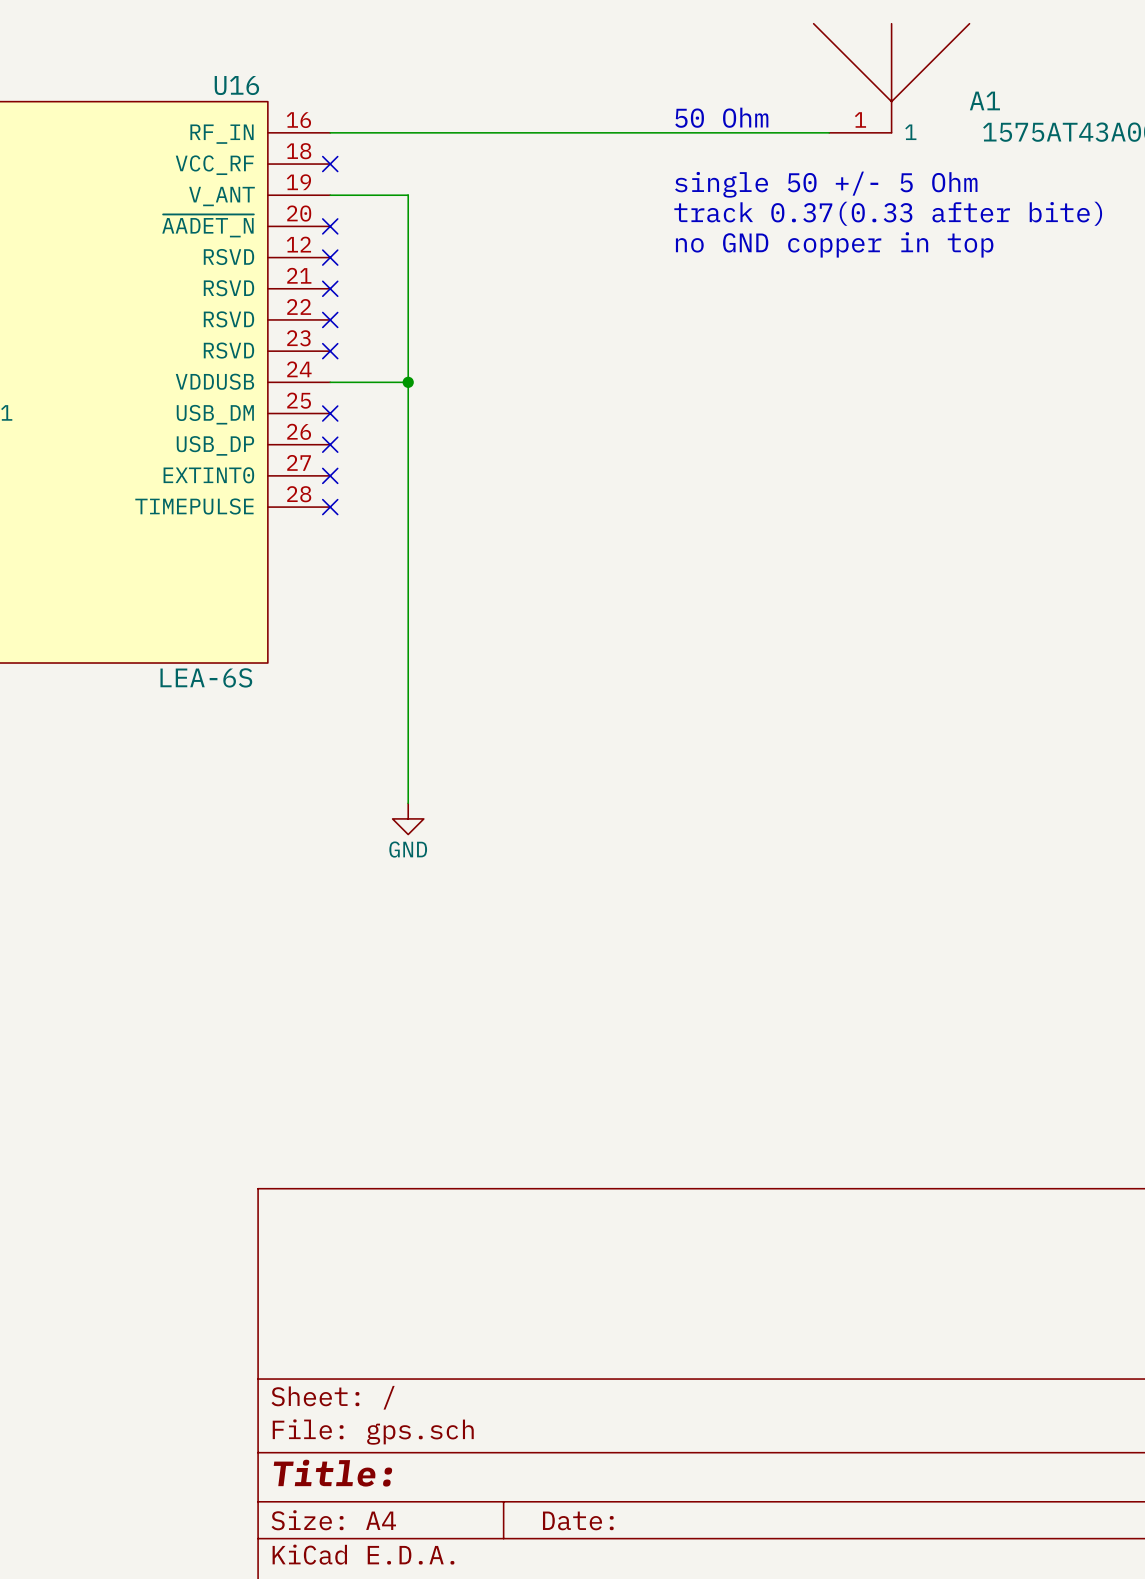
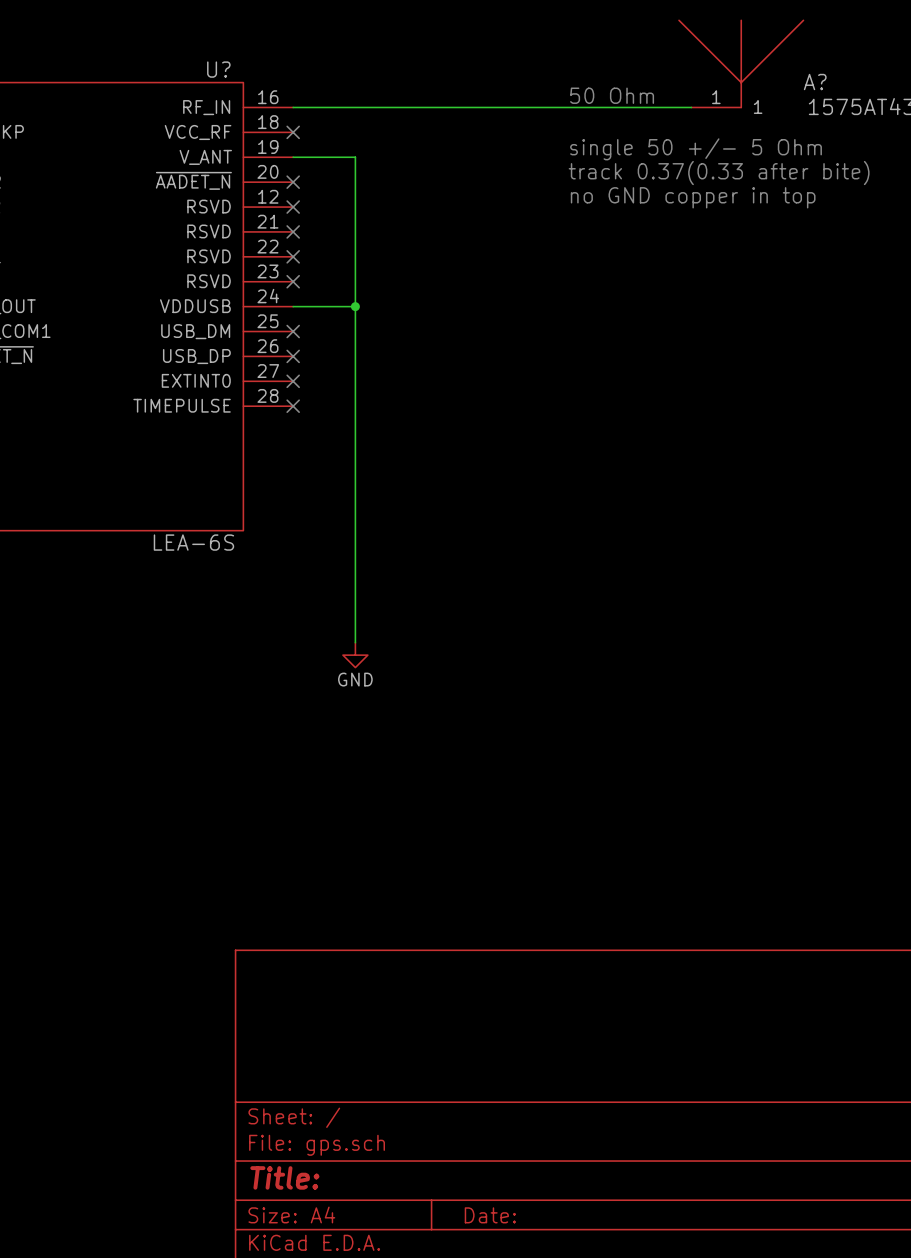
U16 name: U16 (236, 85) -> U? (218, 69)
A1 name: A1 (984, 100) -> A? (815, 82)

